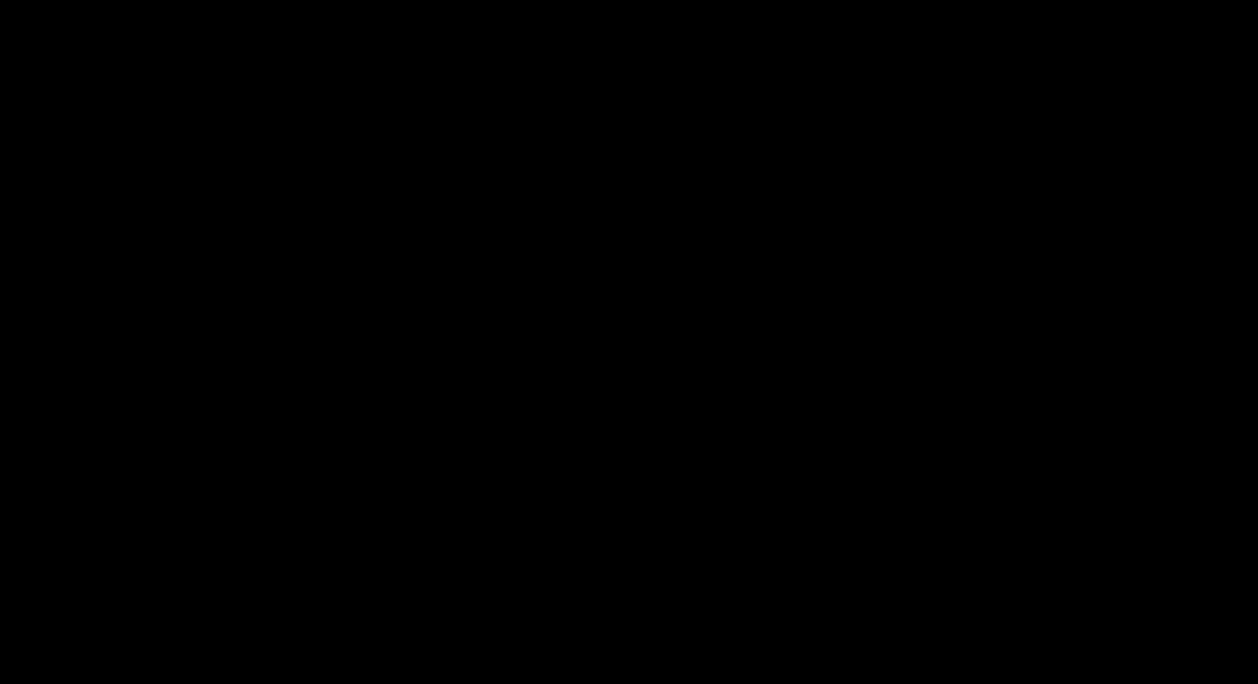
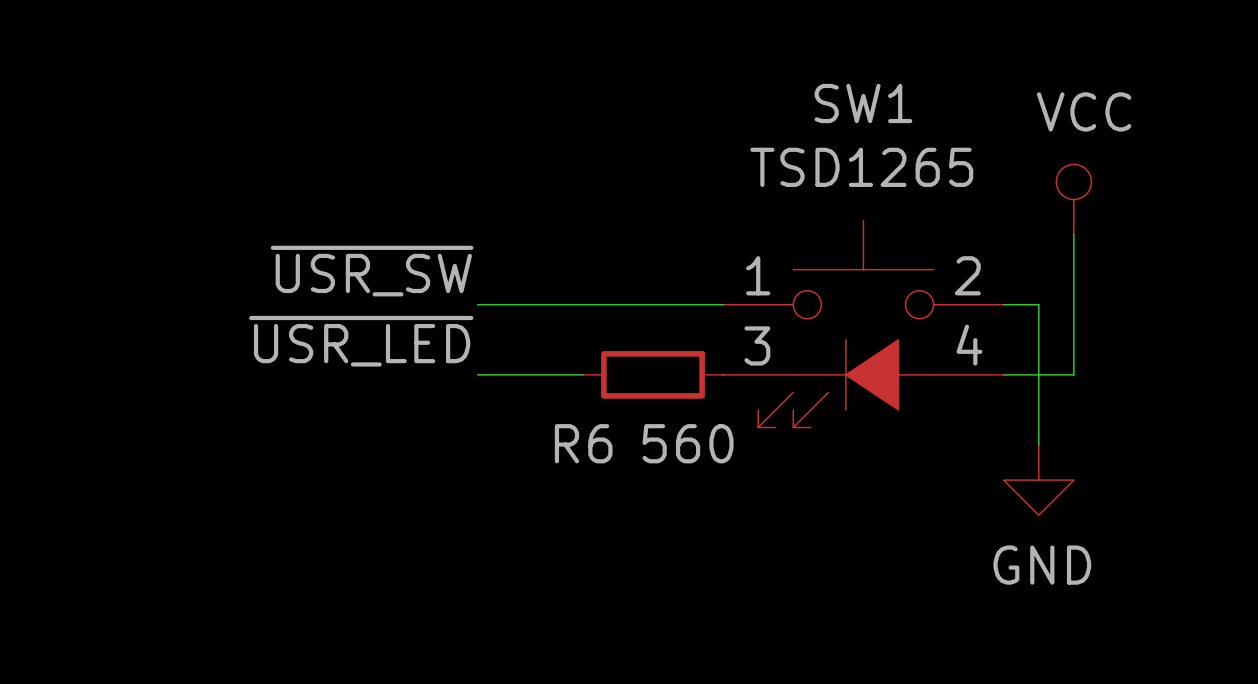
power symbol: none -> VCC (1073, 199)
wire: none -> (1073, 234) (1073, 374) (1003, 374)
label: none -> ~{USR_SW} (372, 271)
wire: none -> (477, 304) (723, 304)
wire: none -> (1003, 304) (1038, 304) (1038, 445)
SW1: none -> TSD1265 (863, 324)
label: none -> ~{USR_LED} (361, 341)
wire: none -> (477, 374) (582, 374)
R6: none -> 560 (652, 374)
power symbol: none -> GND (1038, 480)

